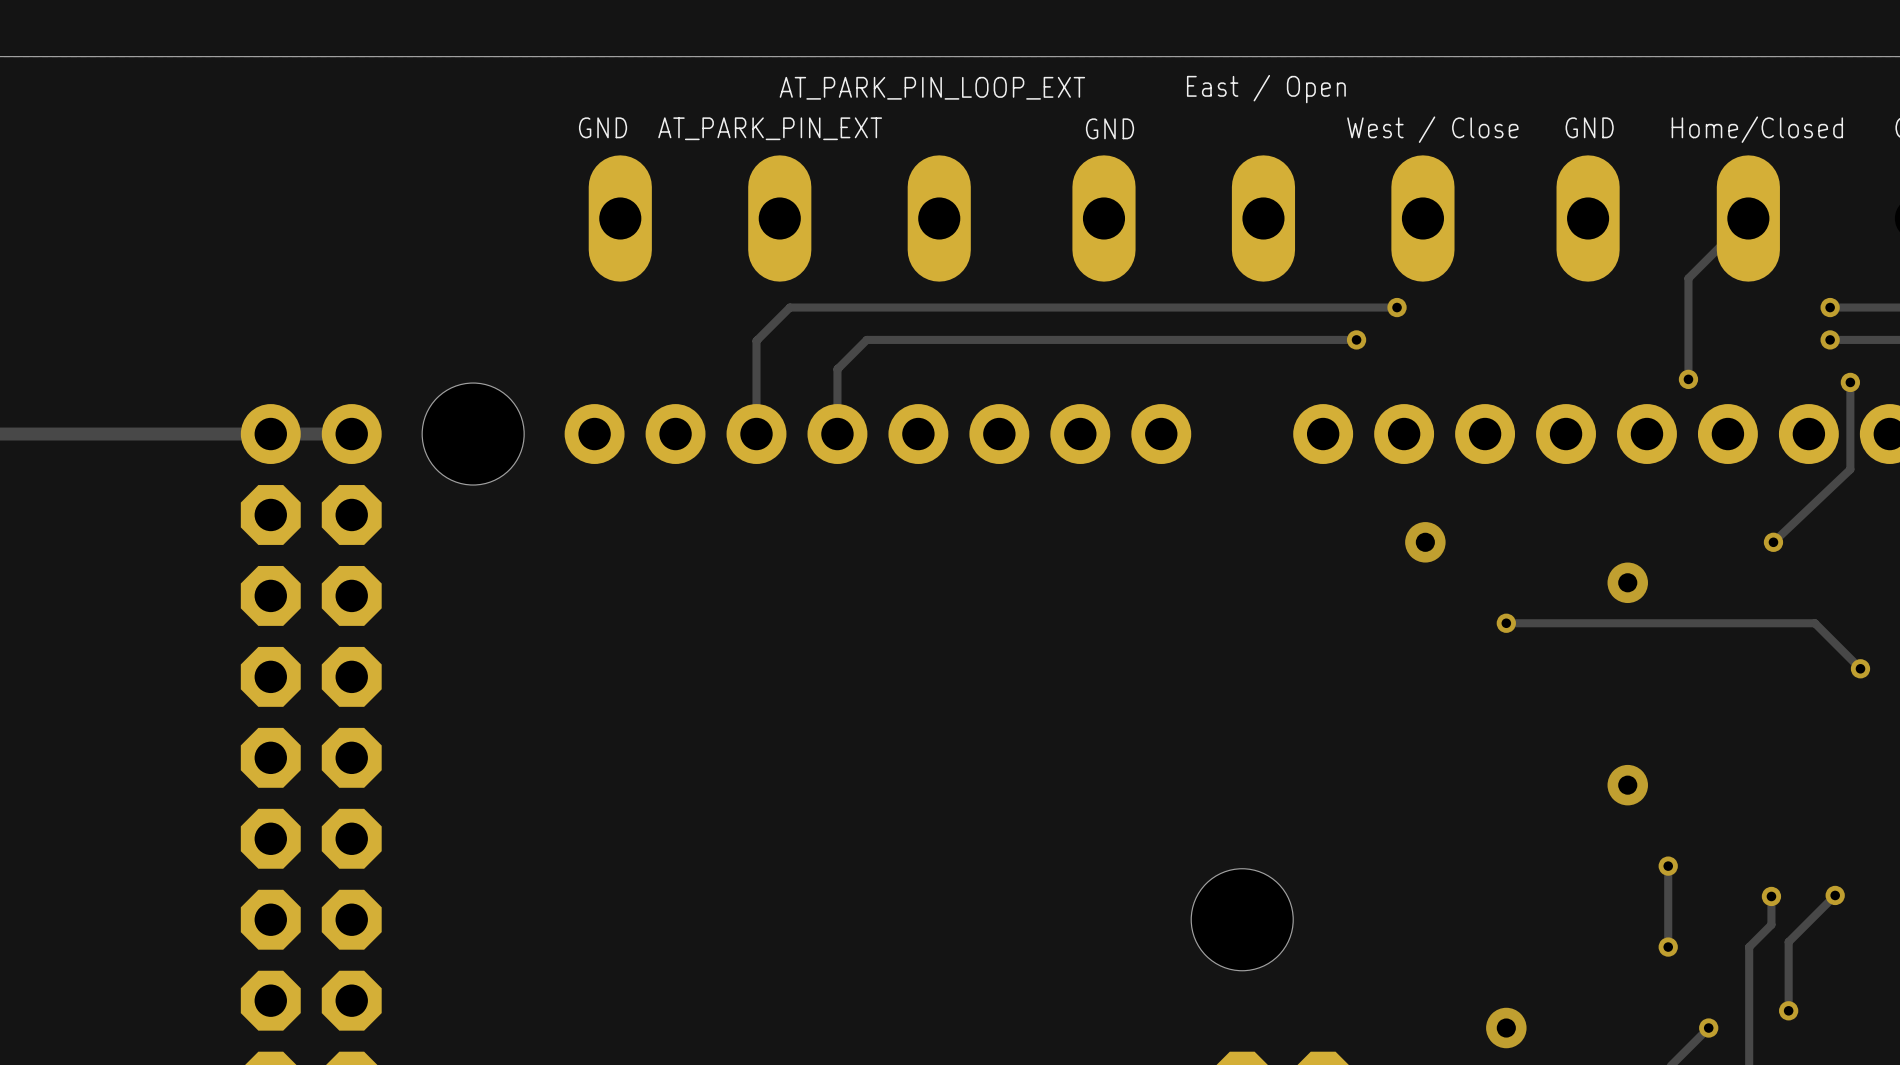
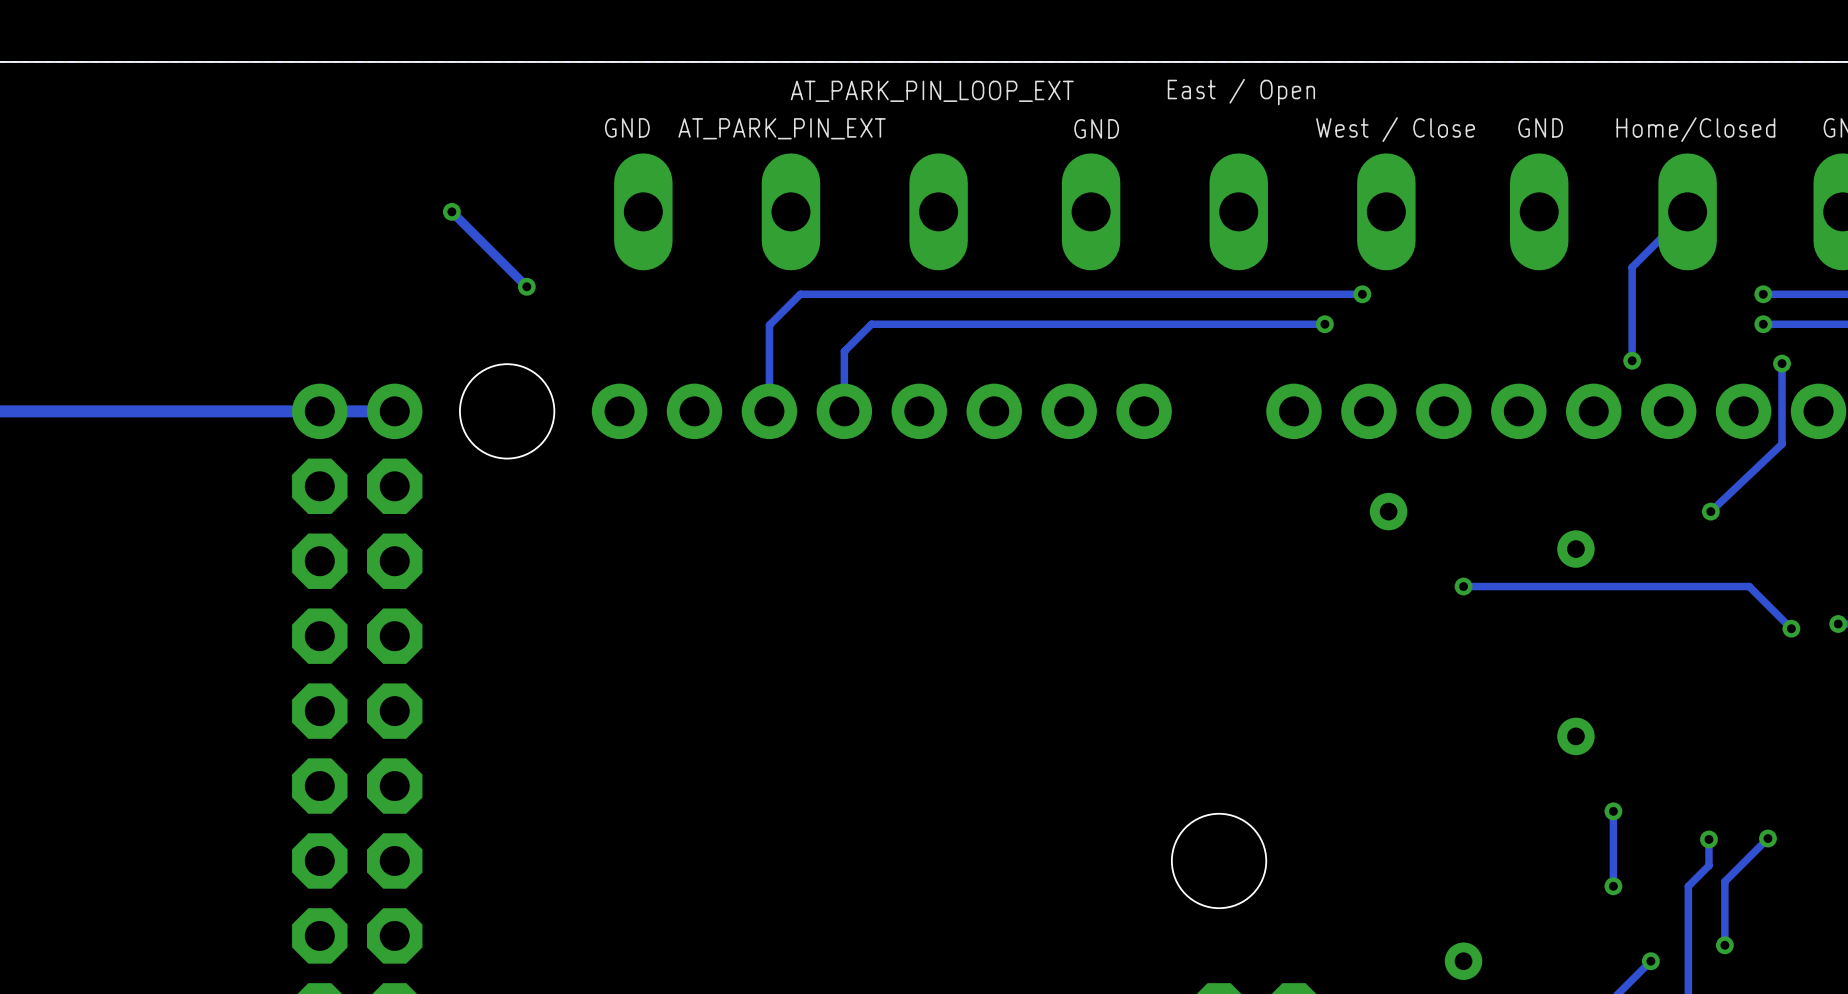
track: none -> (451, 211) (526, 286)
via: none -> (451, 211)
via: none -> (526, 286)

